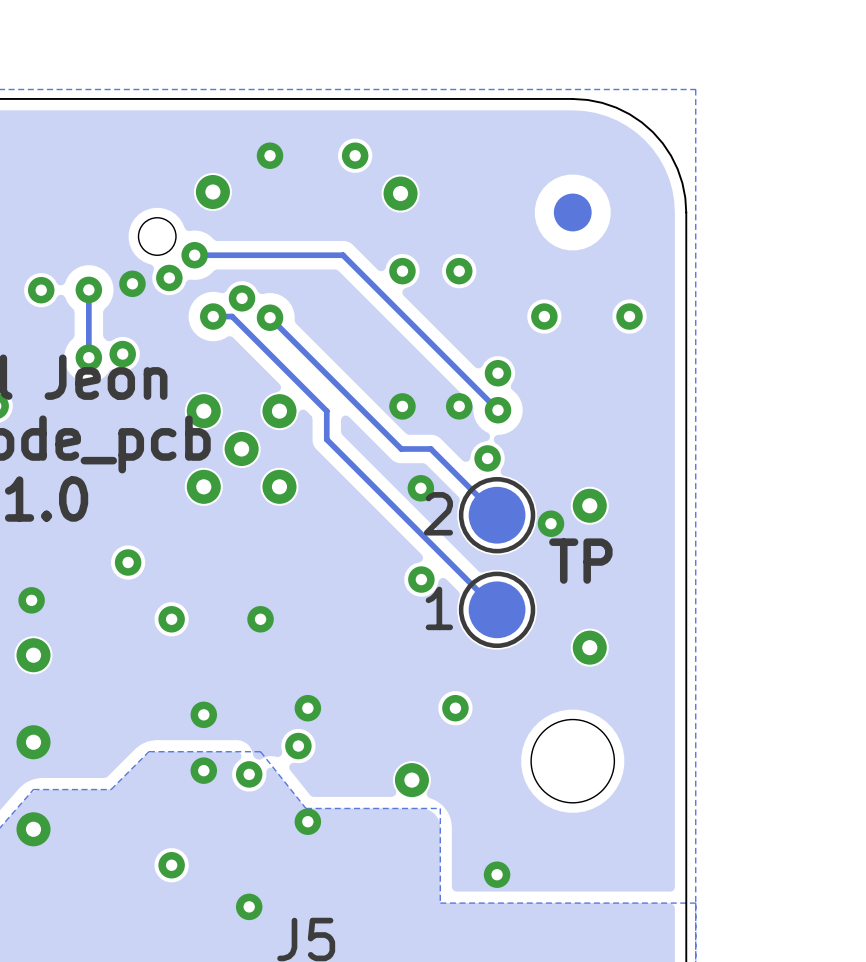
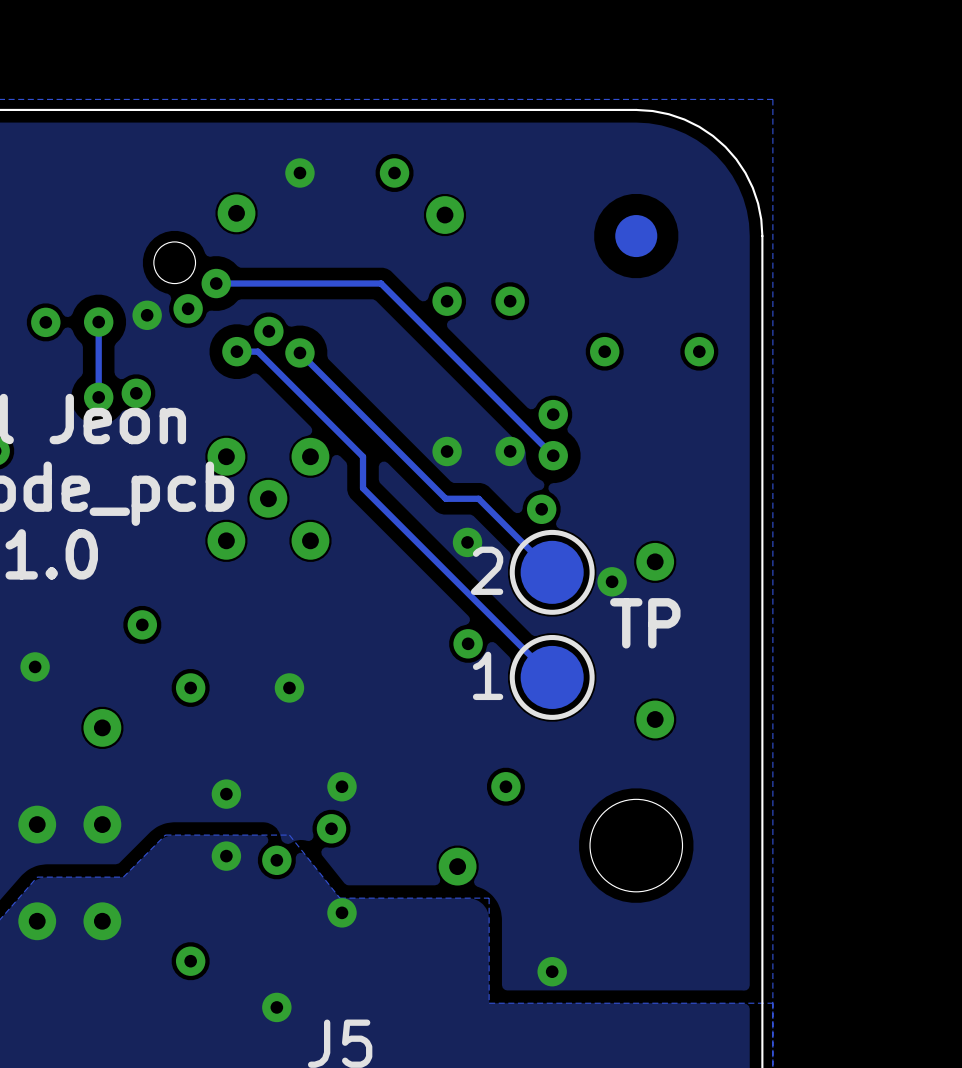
via: (33, 655) -> none
via: none -> (102, 727)
via: none -> (102, 824)
via: none -> (102, 921)

